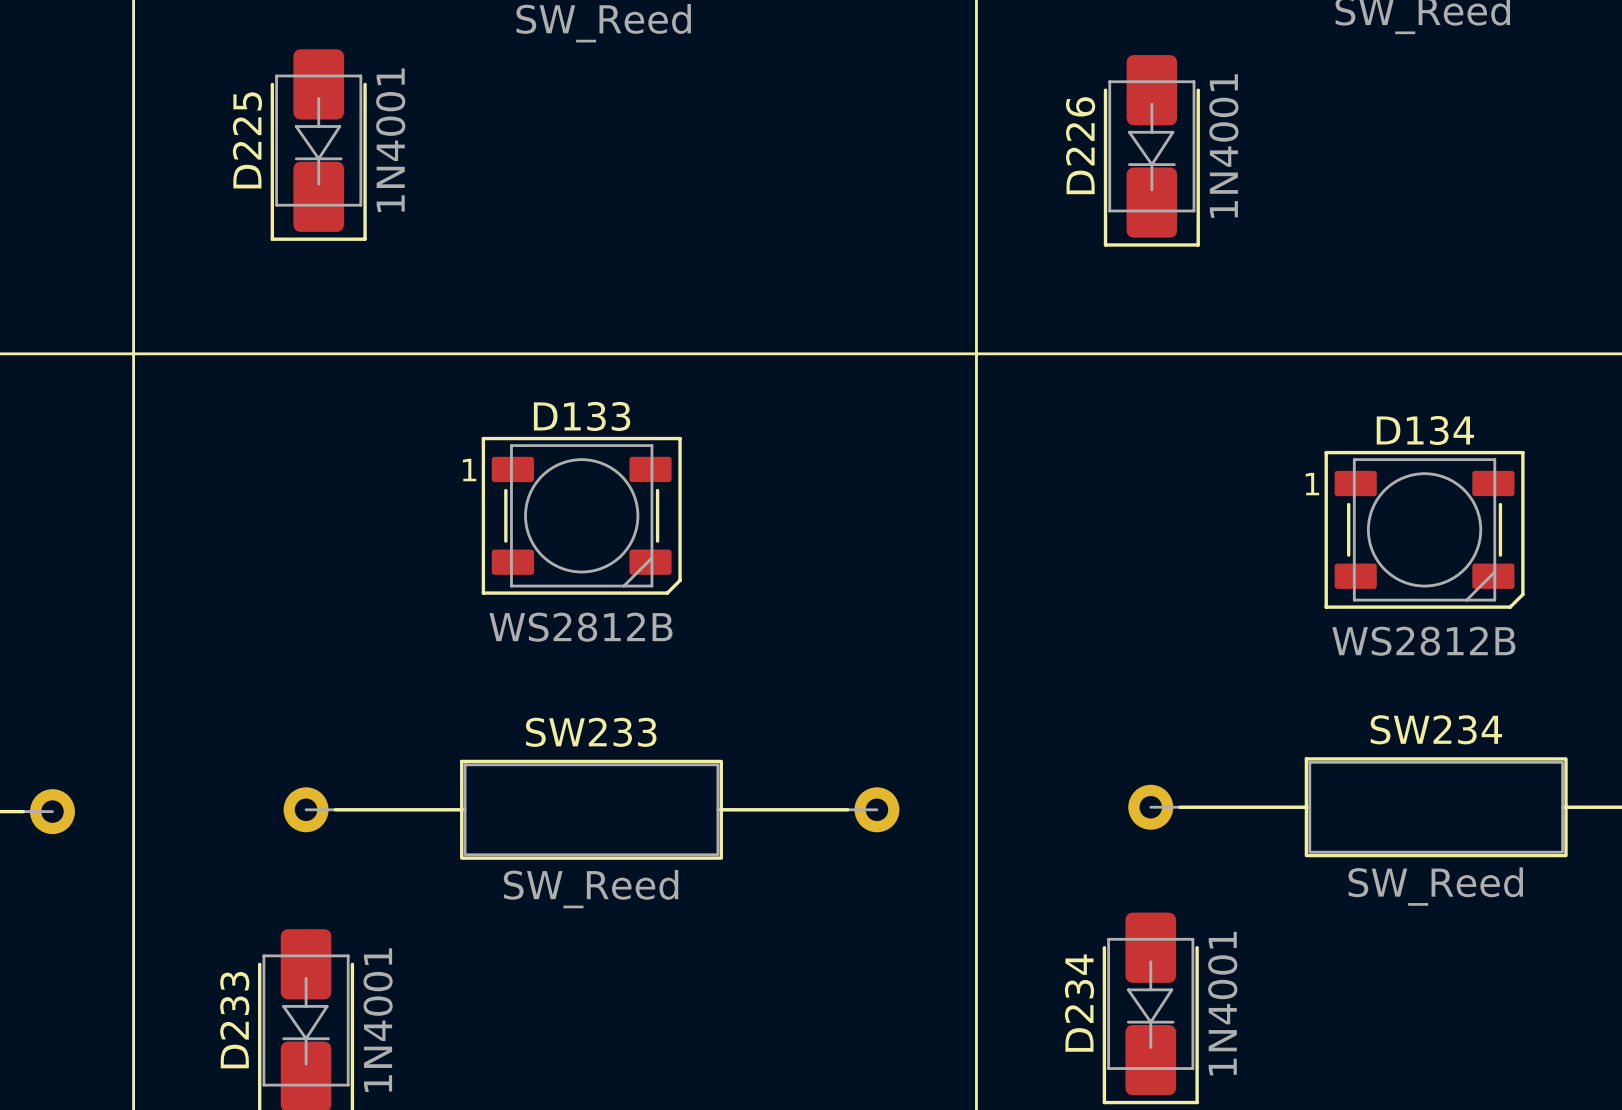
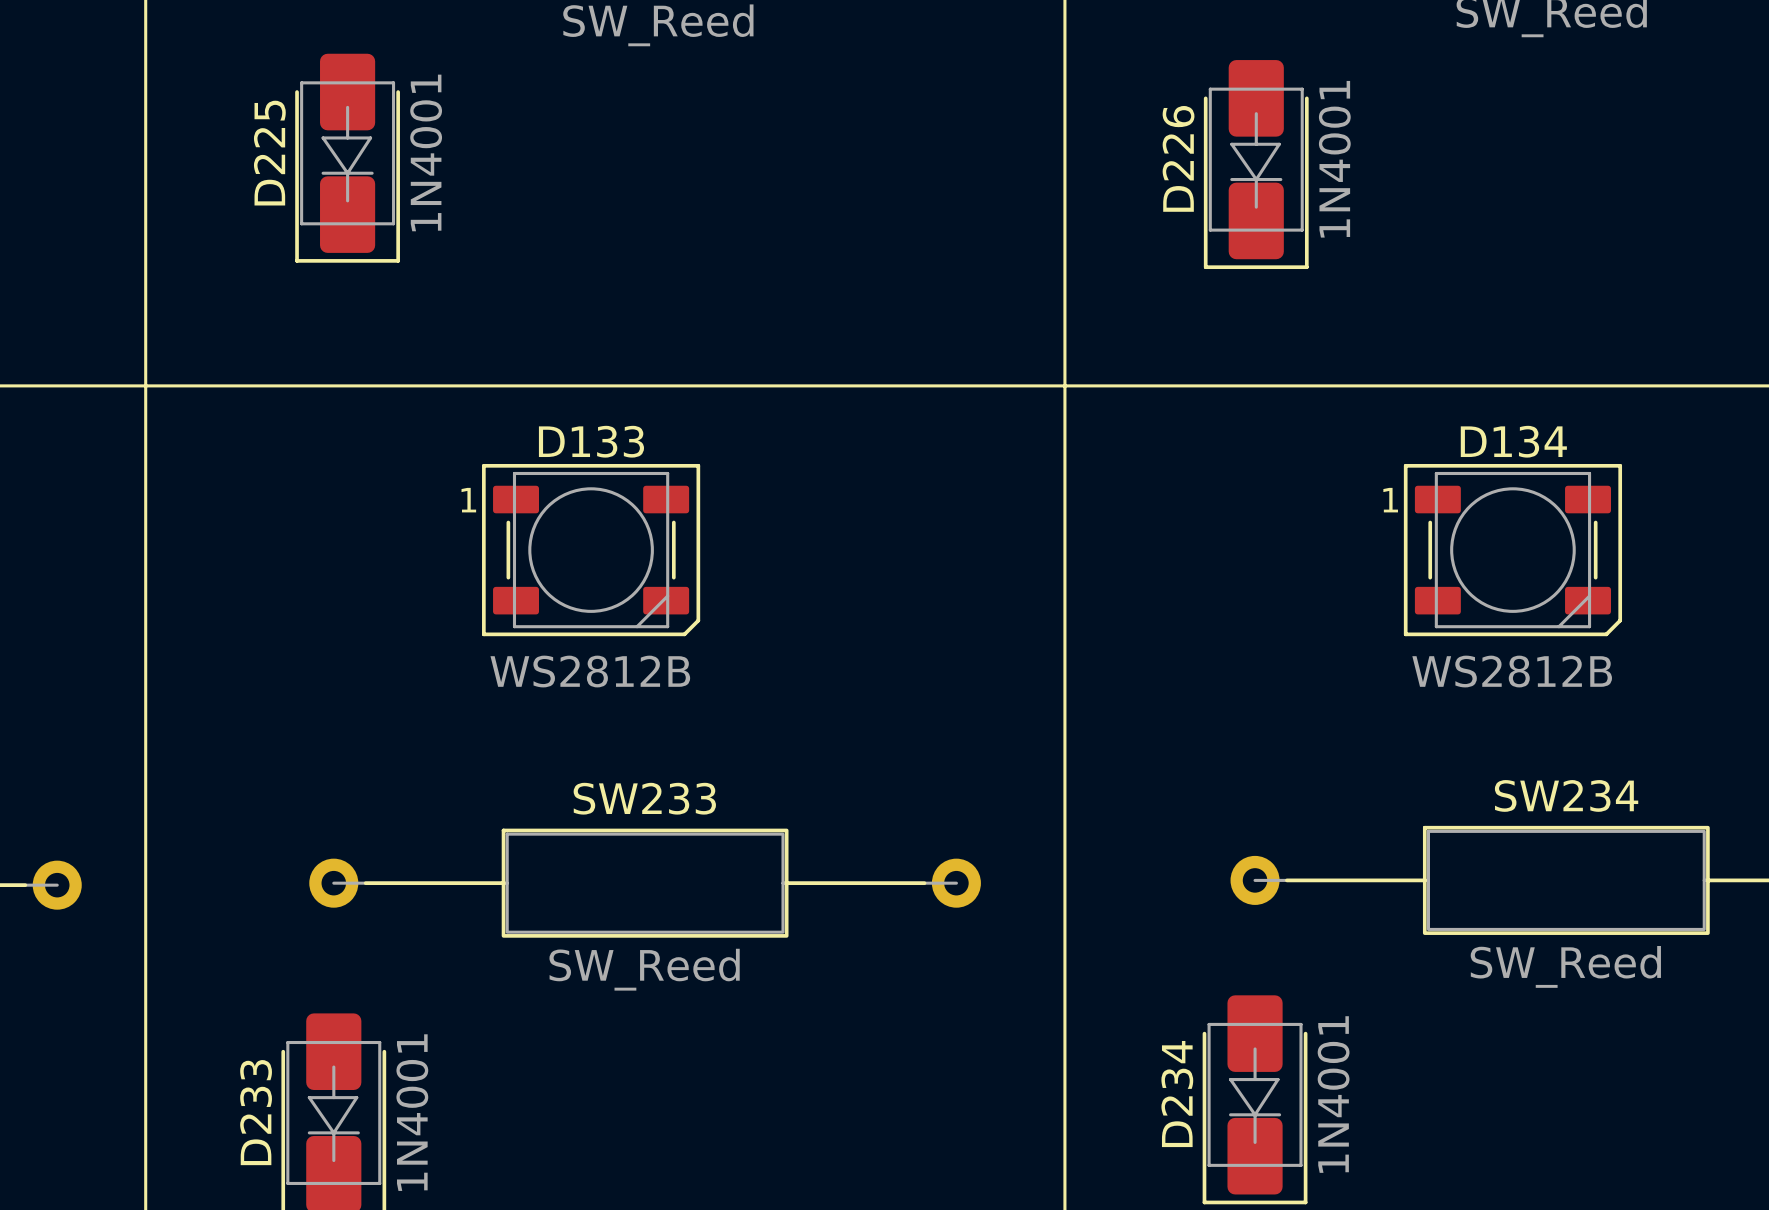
D133 position: (581, 515) -> (591, 550)
D134 position: (1424, 529) -> (1512, 550)

